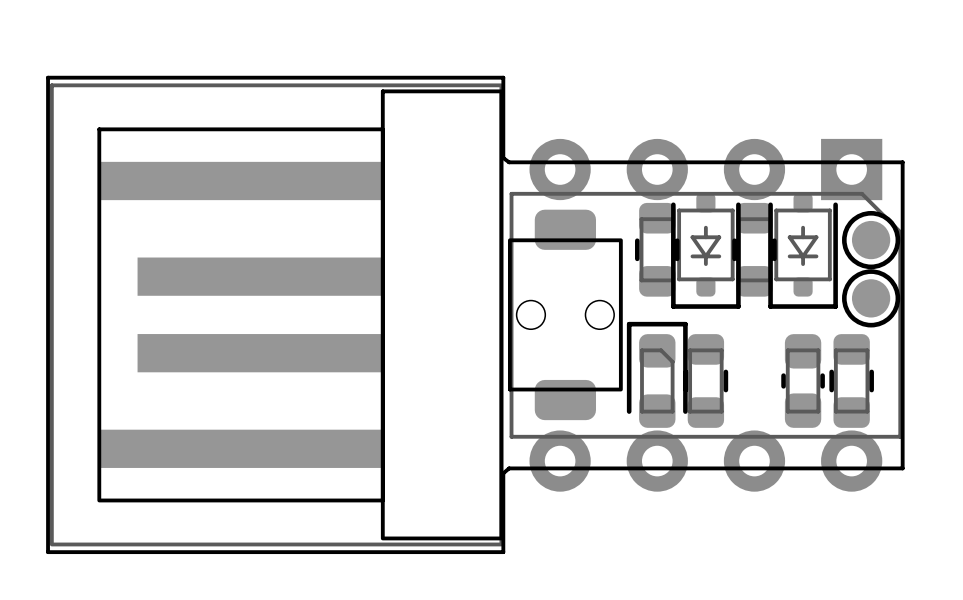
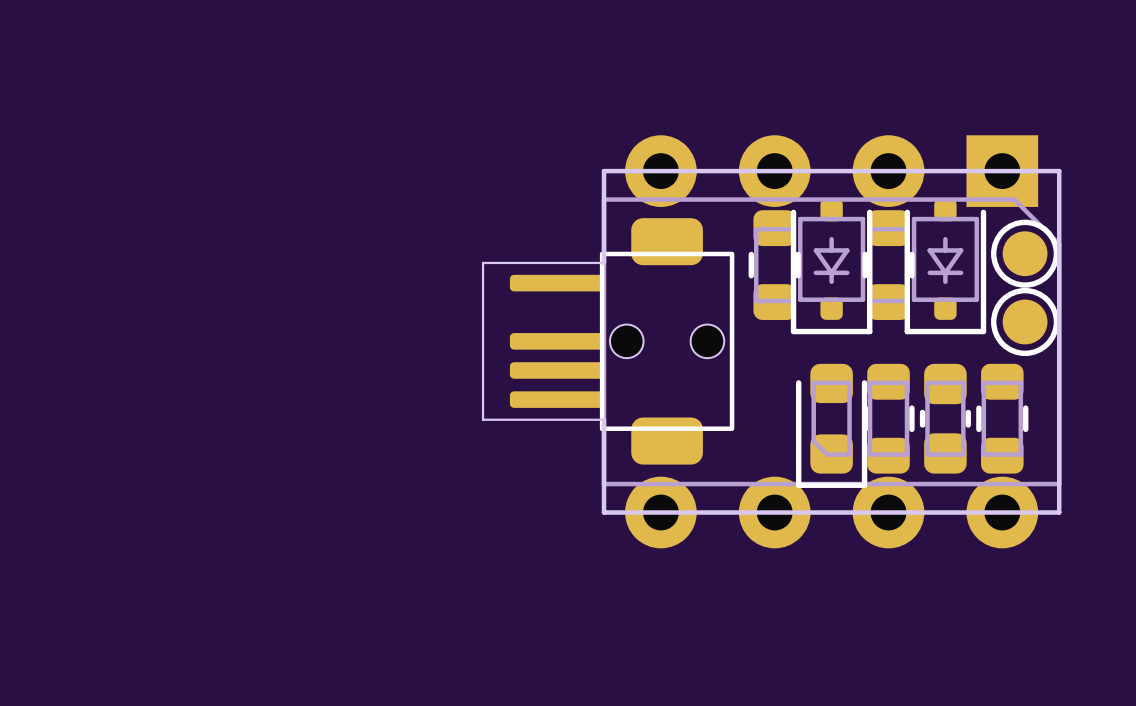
board edge: (48, 77) (503, 77) (503, 158) (509, 162) (902, 162) (902, 468) (509, 468) (503, 473) (503, 552) (48, 552) (48, 77) -> none
board edge: none -> (604, 262) (604, 171) (1059, 171) (1059, 512) (604, 512) (604, 419)
part: (276, 314) -> none
part: none -> (543, 341)
part footprint: [683, 334, 729, 428] -> [795, 363, 868, 488]
part: (657, 374) -> none
part: none -> (888, 418)

